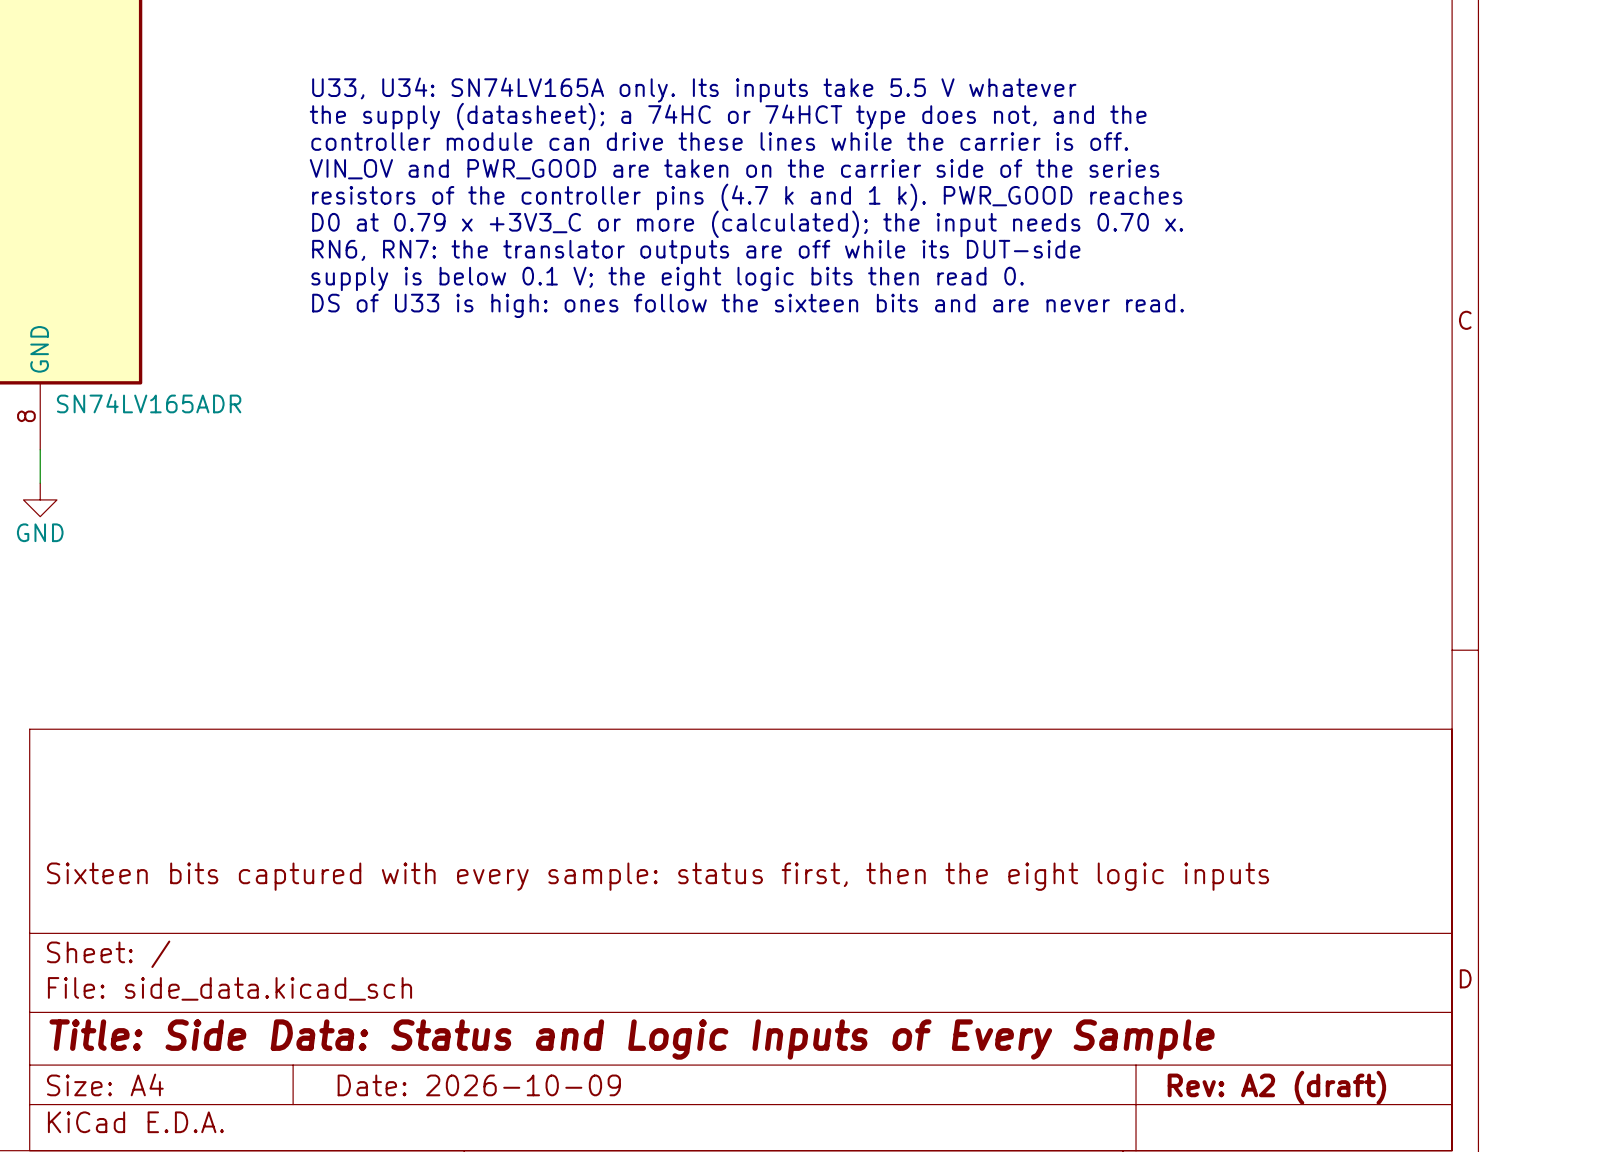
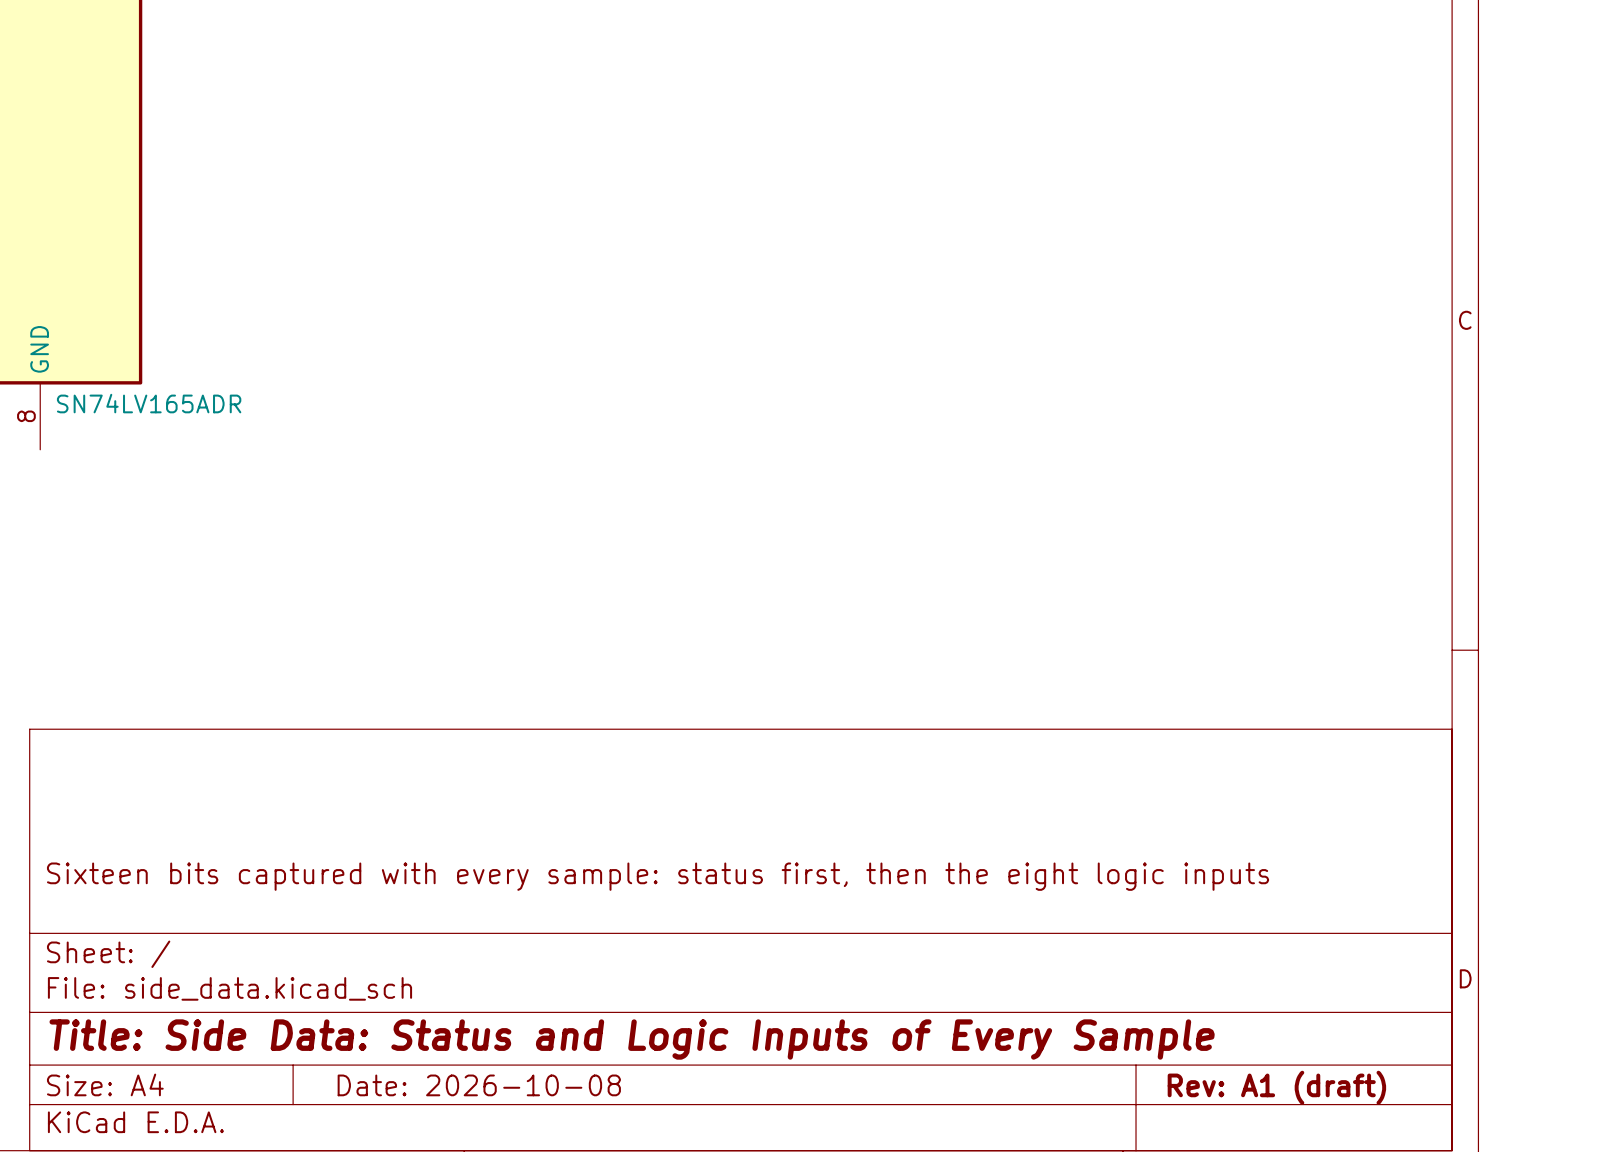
text: U33, U34: SN74LV165A only. Its inputs take 5.5 V whatever (694, 90) -> none
text: the supply (datasheet); a 74HC or 74HCT type does not, and the (728, 116) -> none
text: controller module can drive these lines while the carrier is off. (719, 141) -> none
text: VIN_OV and PWR_GOOD are taken on the carrier side of the series (734, 169) -> none
text: resistors of the controller pins (4.7 k and 1 k). PWR_GOOD reaches (747, 197) -> none
text: D0 at 0.79 x +3V3_C or more (calculated); the input needs 0.70 x. (747, 224) -> none
text: RN6, RN7: the translator outputs are off while its DUT-side (696, 252) -> none
text: supply is below 0.1 V; the eight logic bits then read 0. (667, 278) -> none
text: DS of U33 is high: ones follow the sixteen bits and are never read. (748, 305) -> none
wire: (40, 449) (40, 483) -> none
power symbol: GND (40, 499) -> none
title block: Date: 2026-10-09 (479, 1085) -> Date: 2026-10-08 (479, 1085)
title block: Rev: A2 (draft) (1276, 1087) -> Rev: A1 (draft) (1276, 1087)

